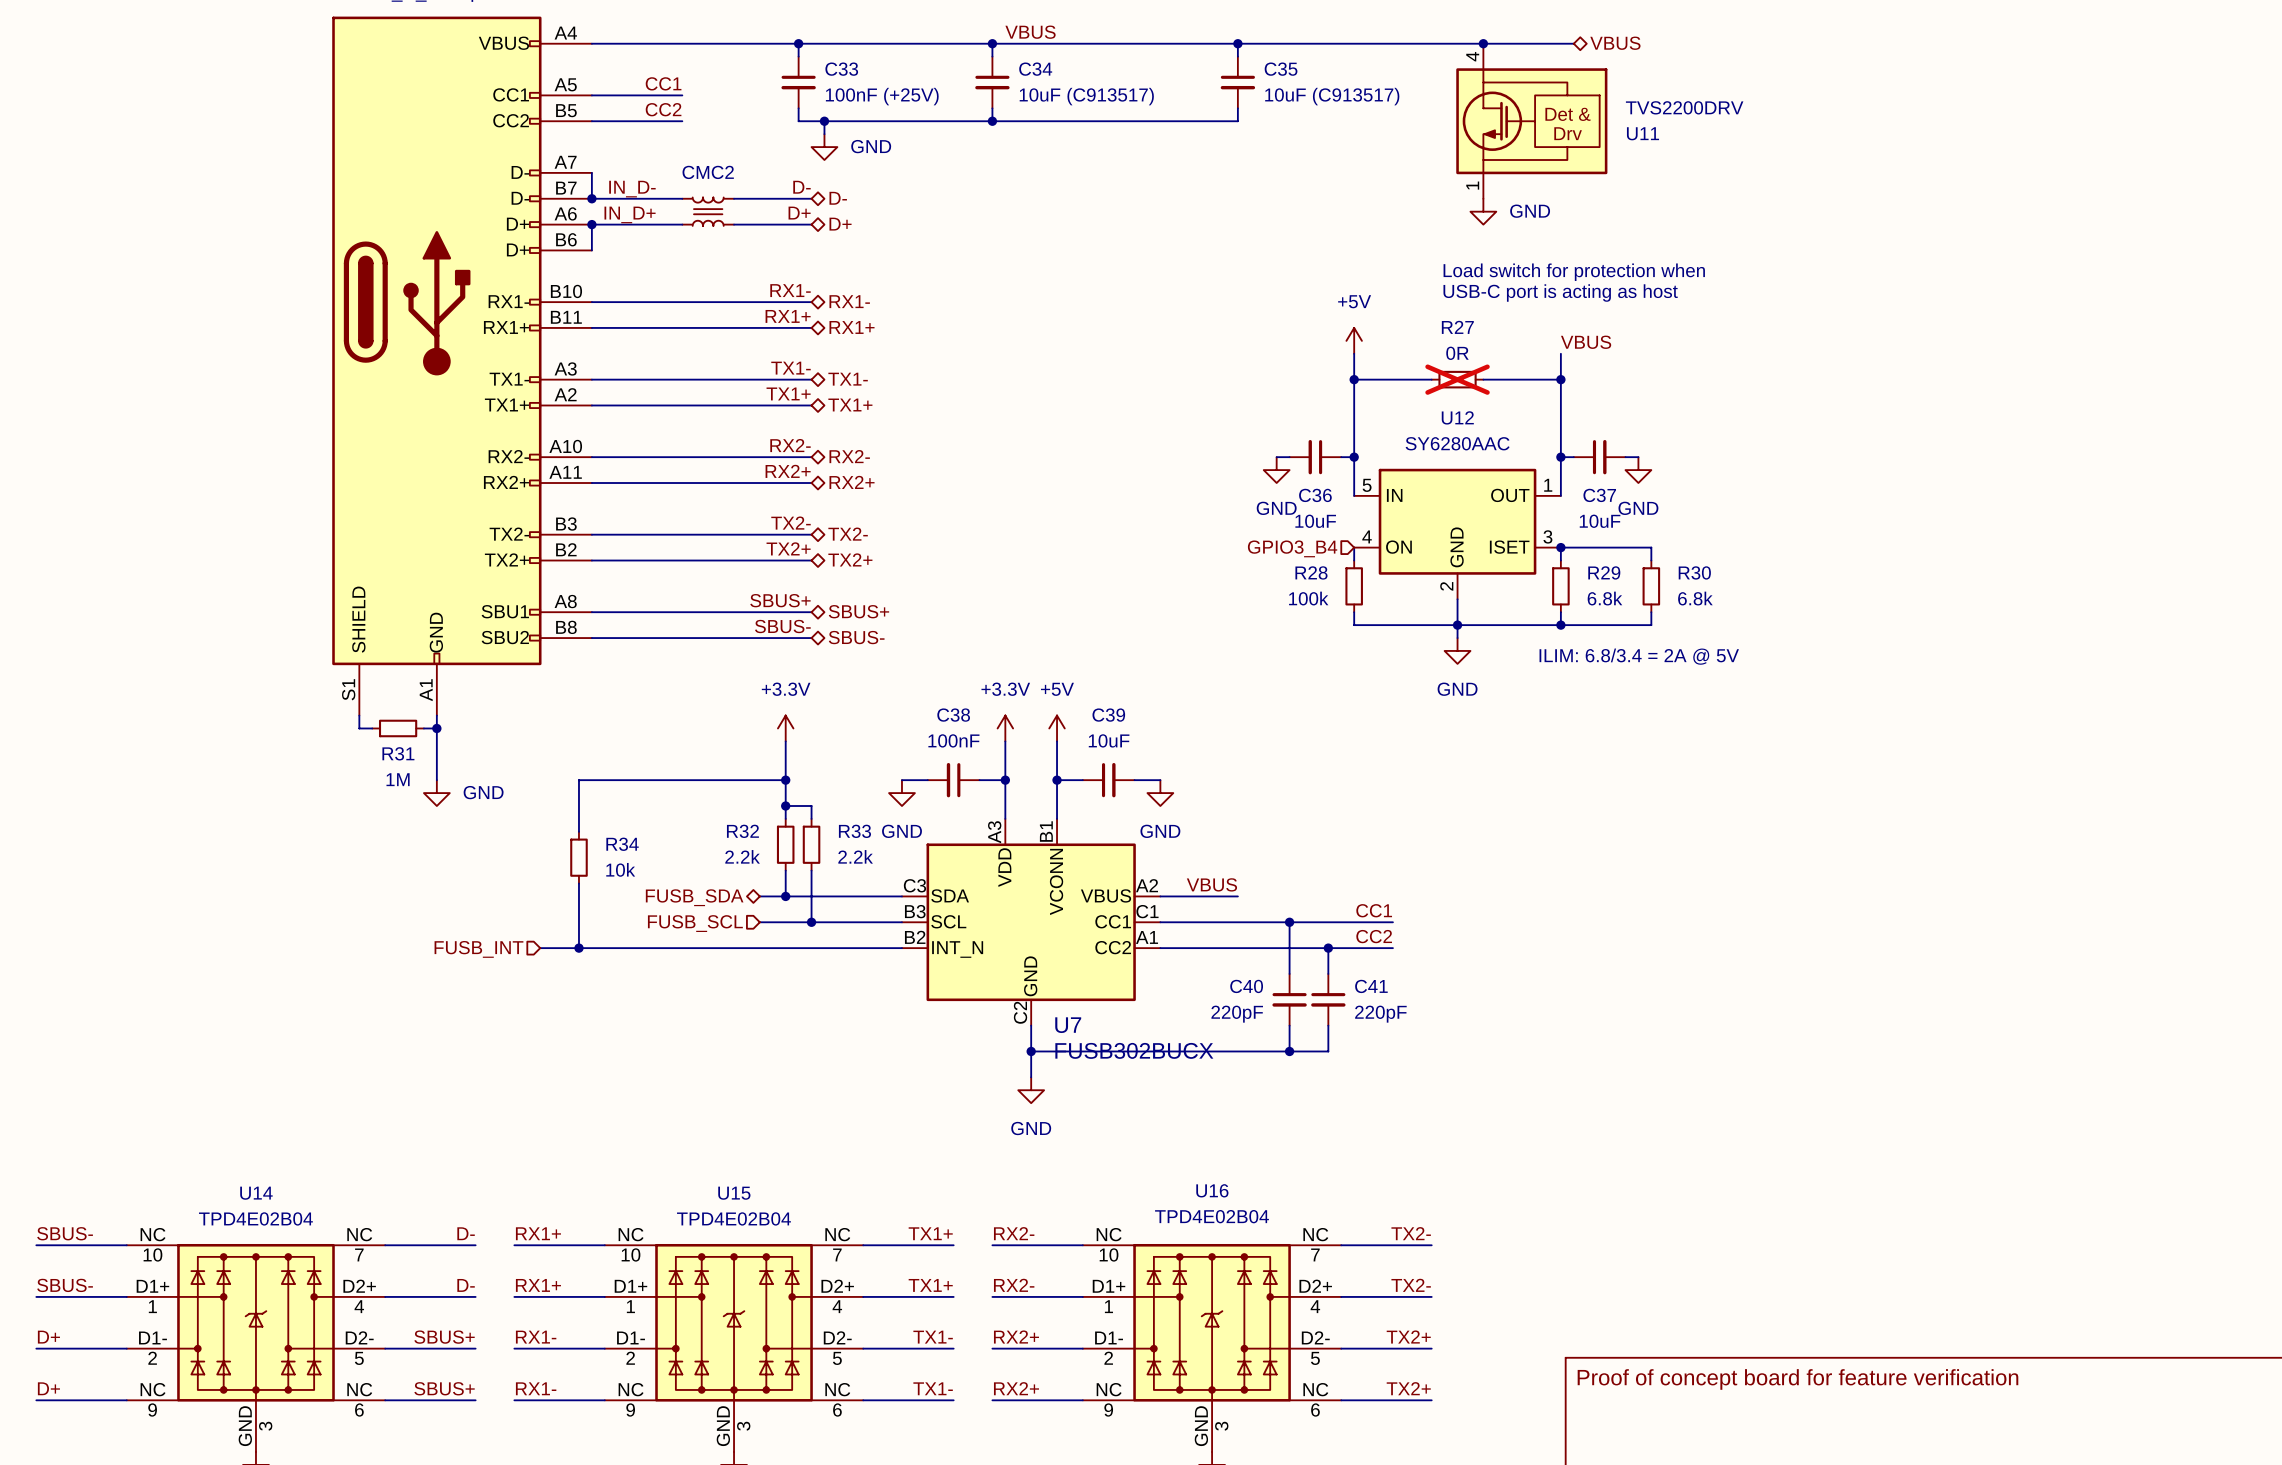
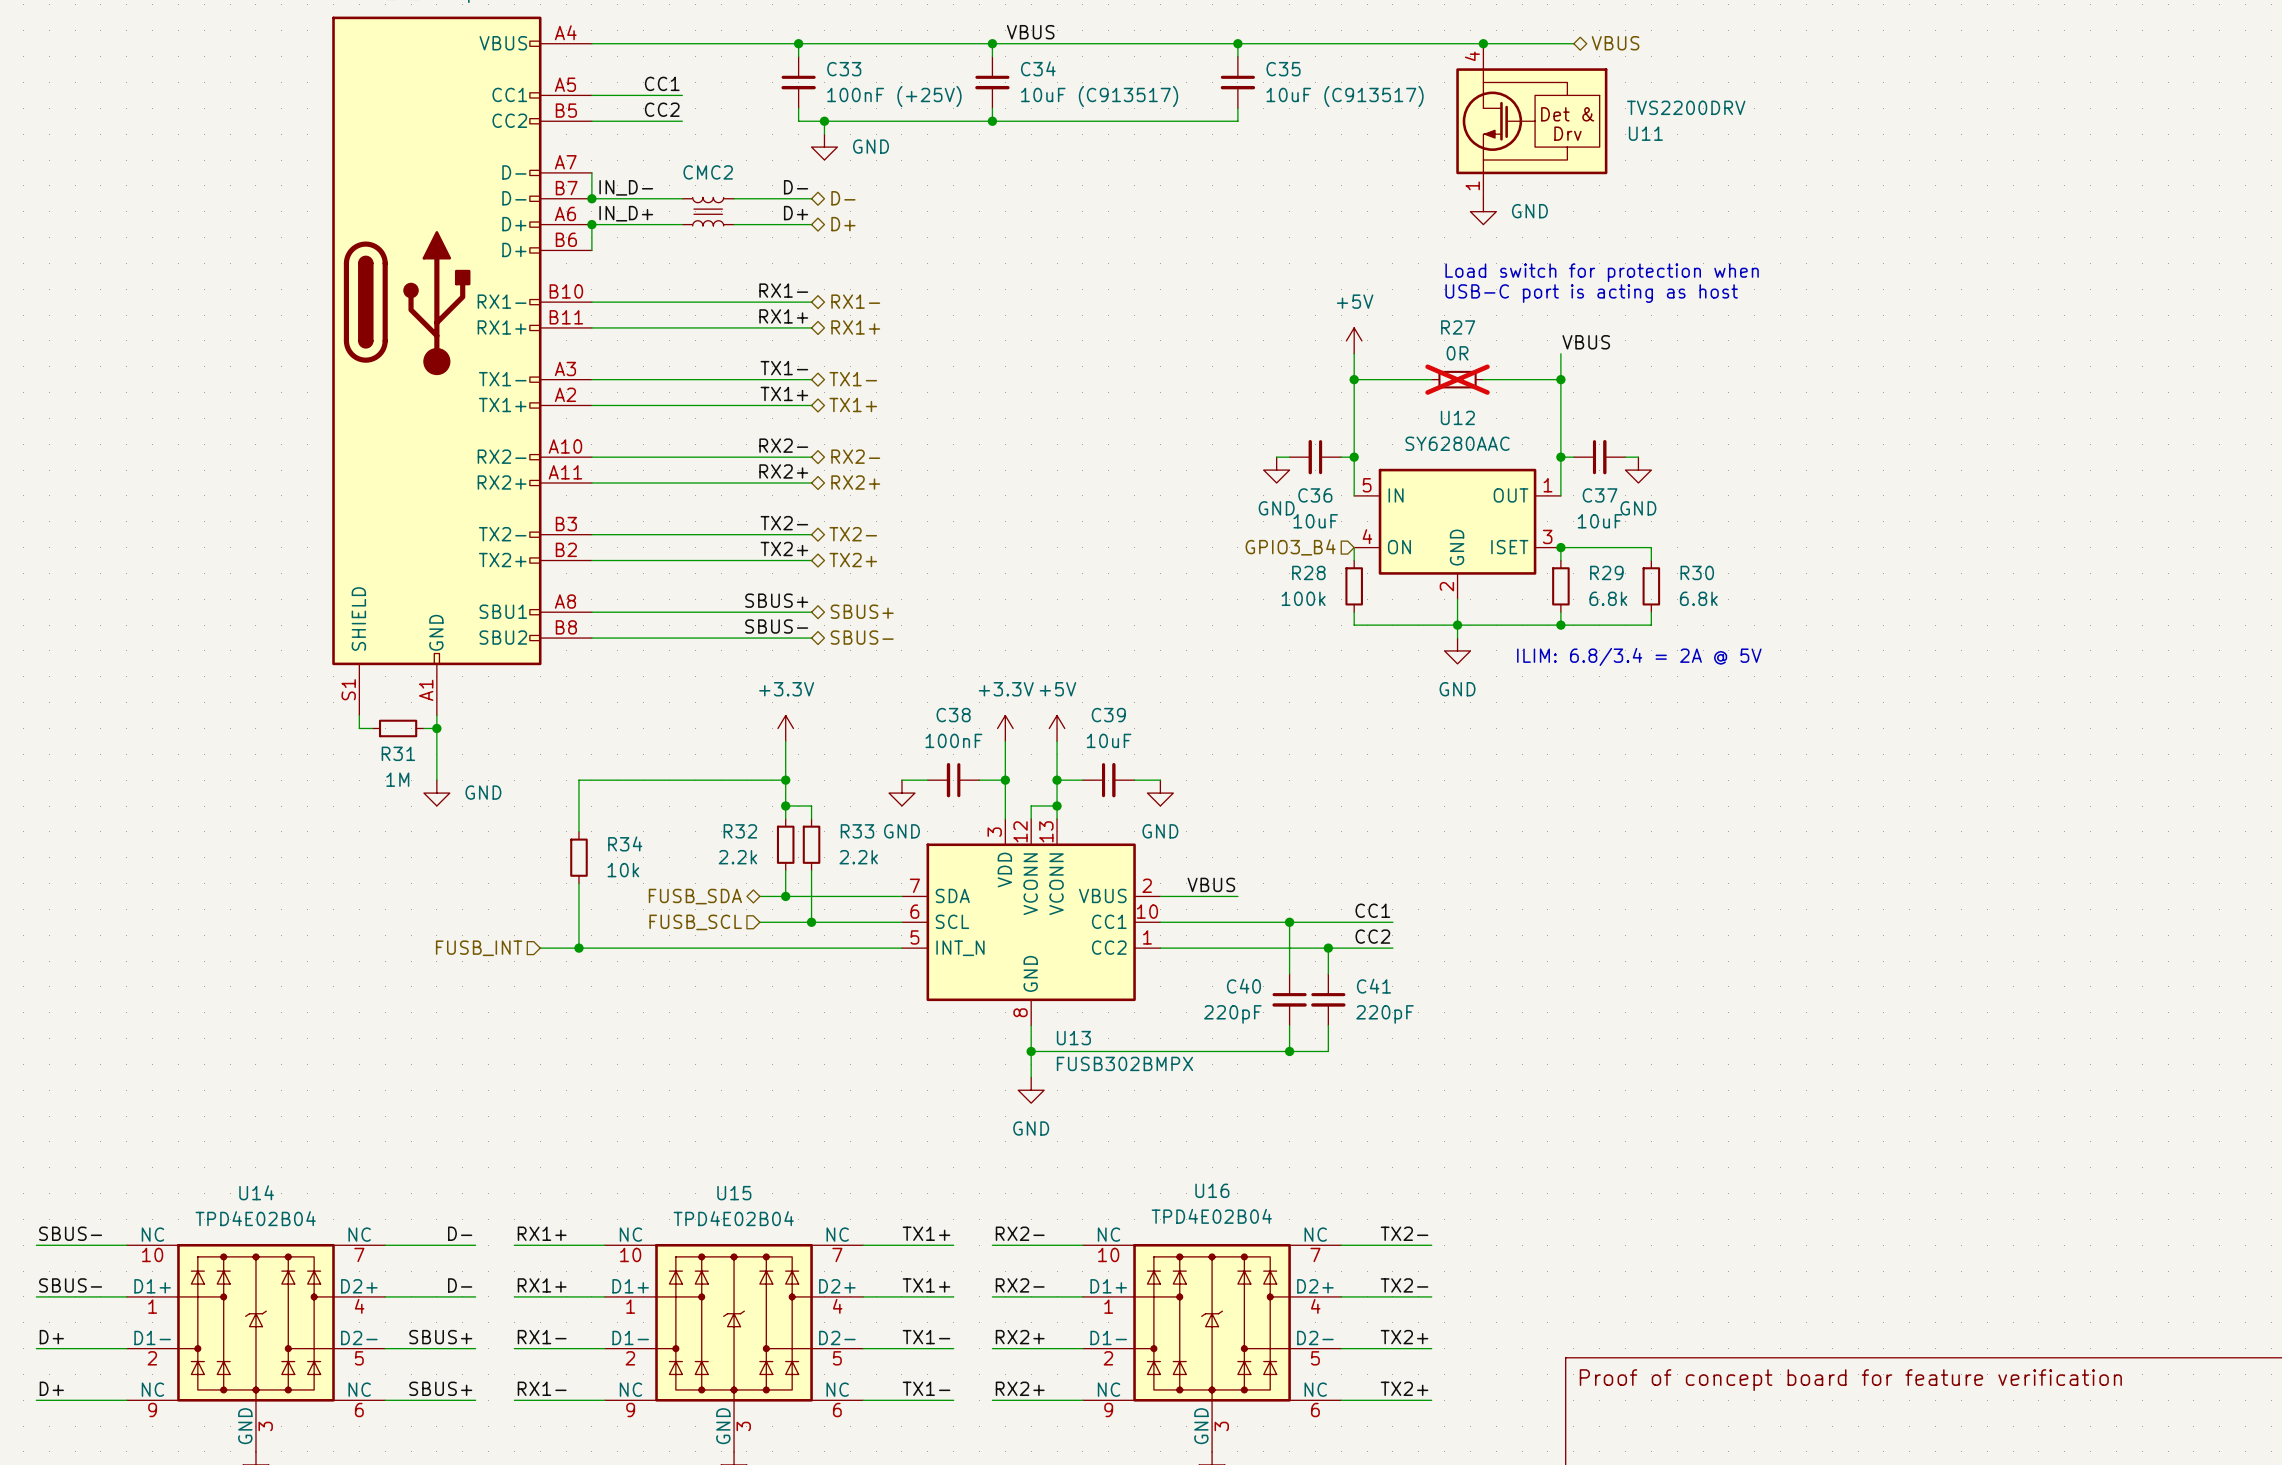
wire: none -> (1057, 806) (1031, 806) (1031, 818)
junction: none -> (1057, 806)
U7: FUSB302BUCX (1031, 922) -> none
U13: none -> FUSB302BMPX (1031, 922)

